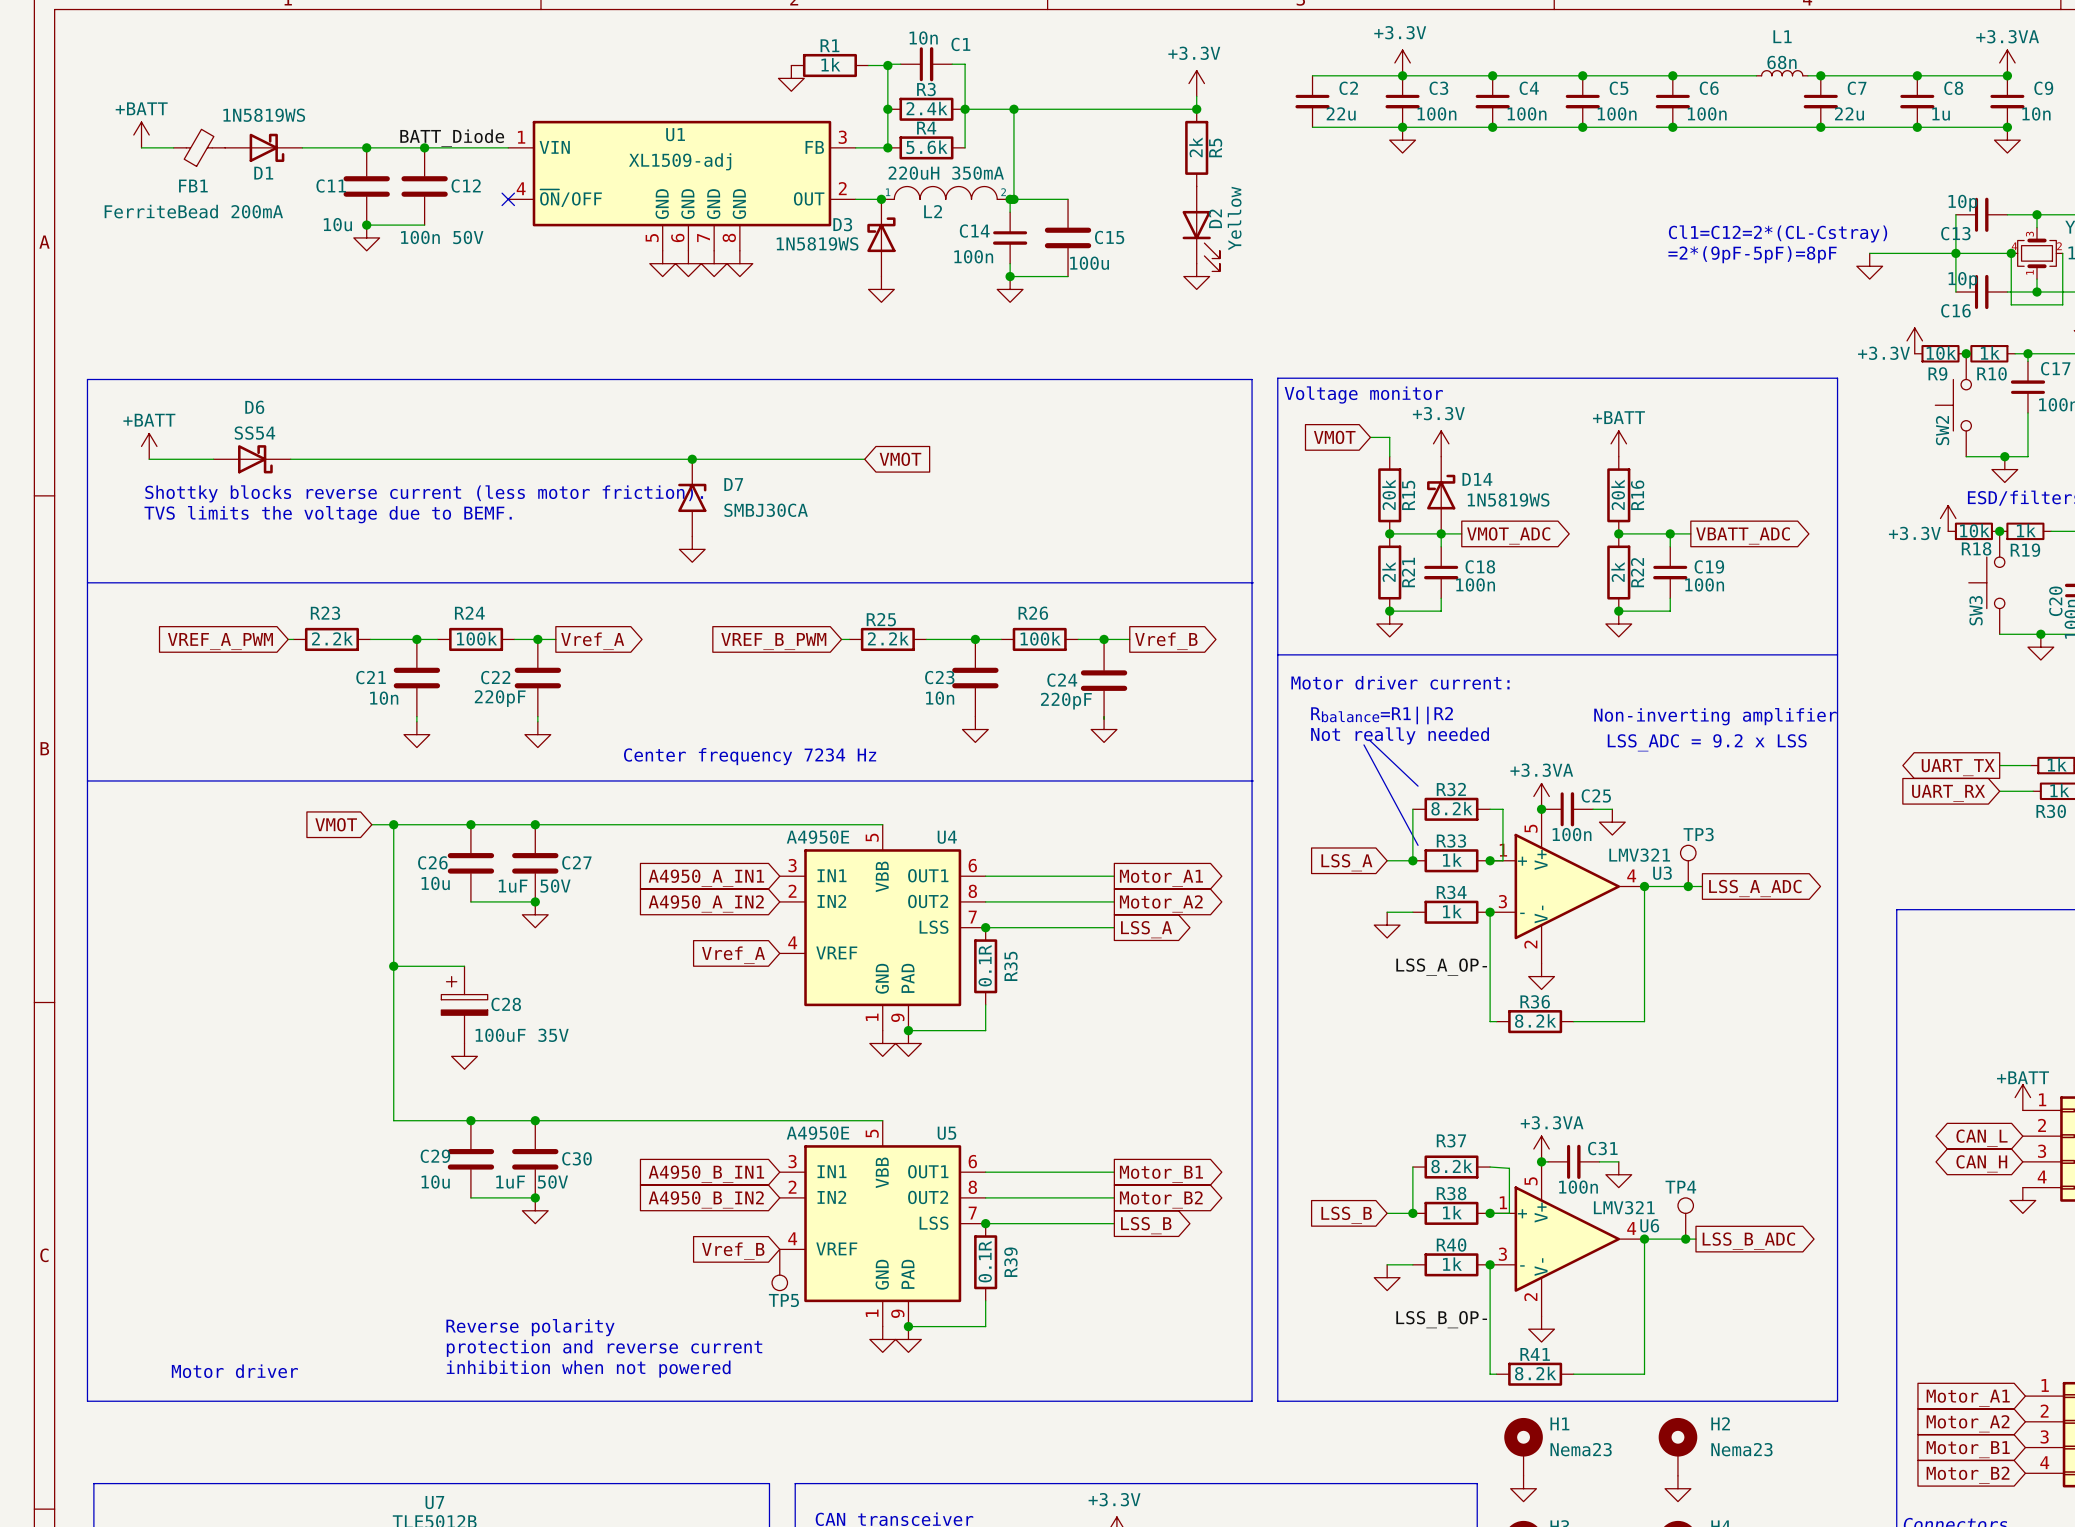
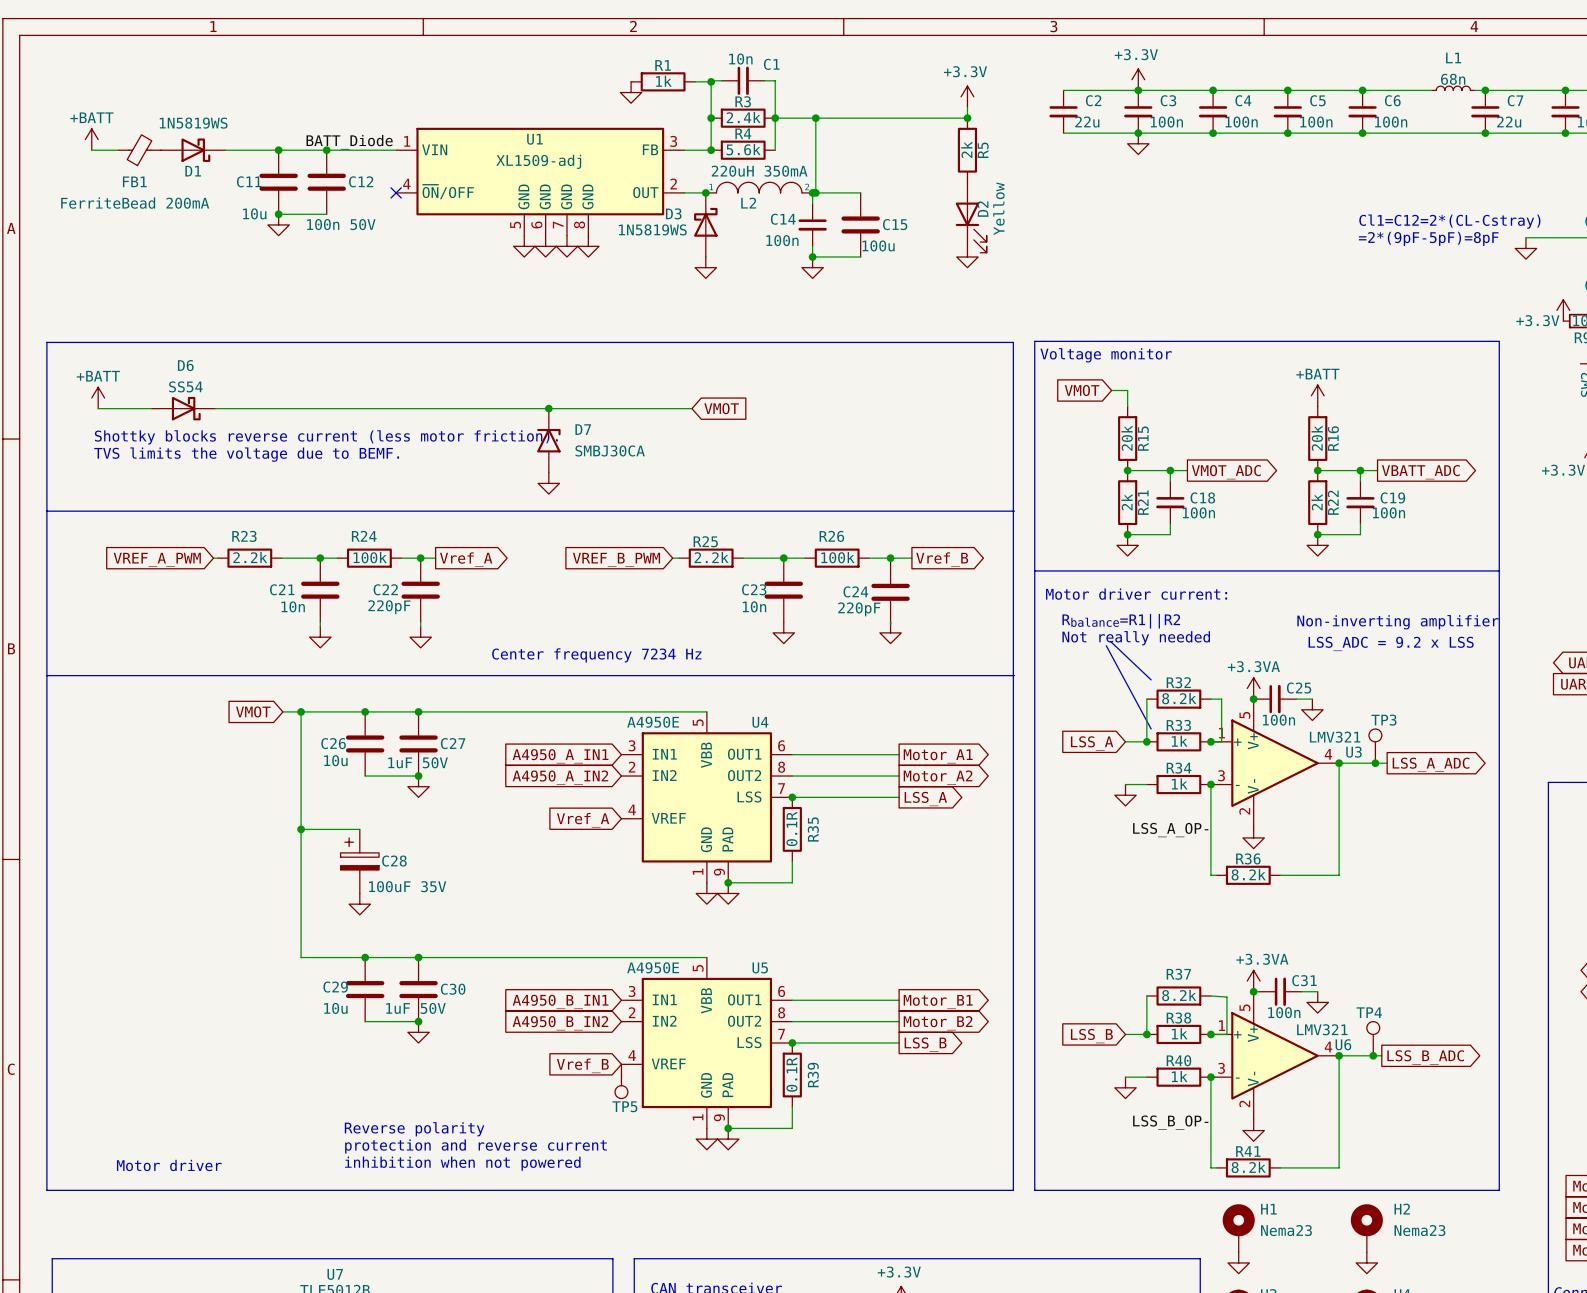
power symbol: +3.3V (1441, 443) -> none
D14: 1N5819WS (1441, 495) -> none

